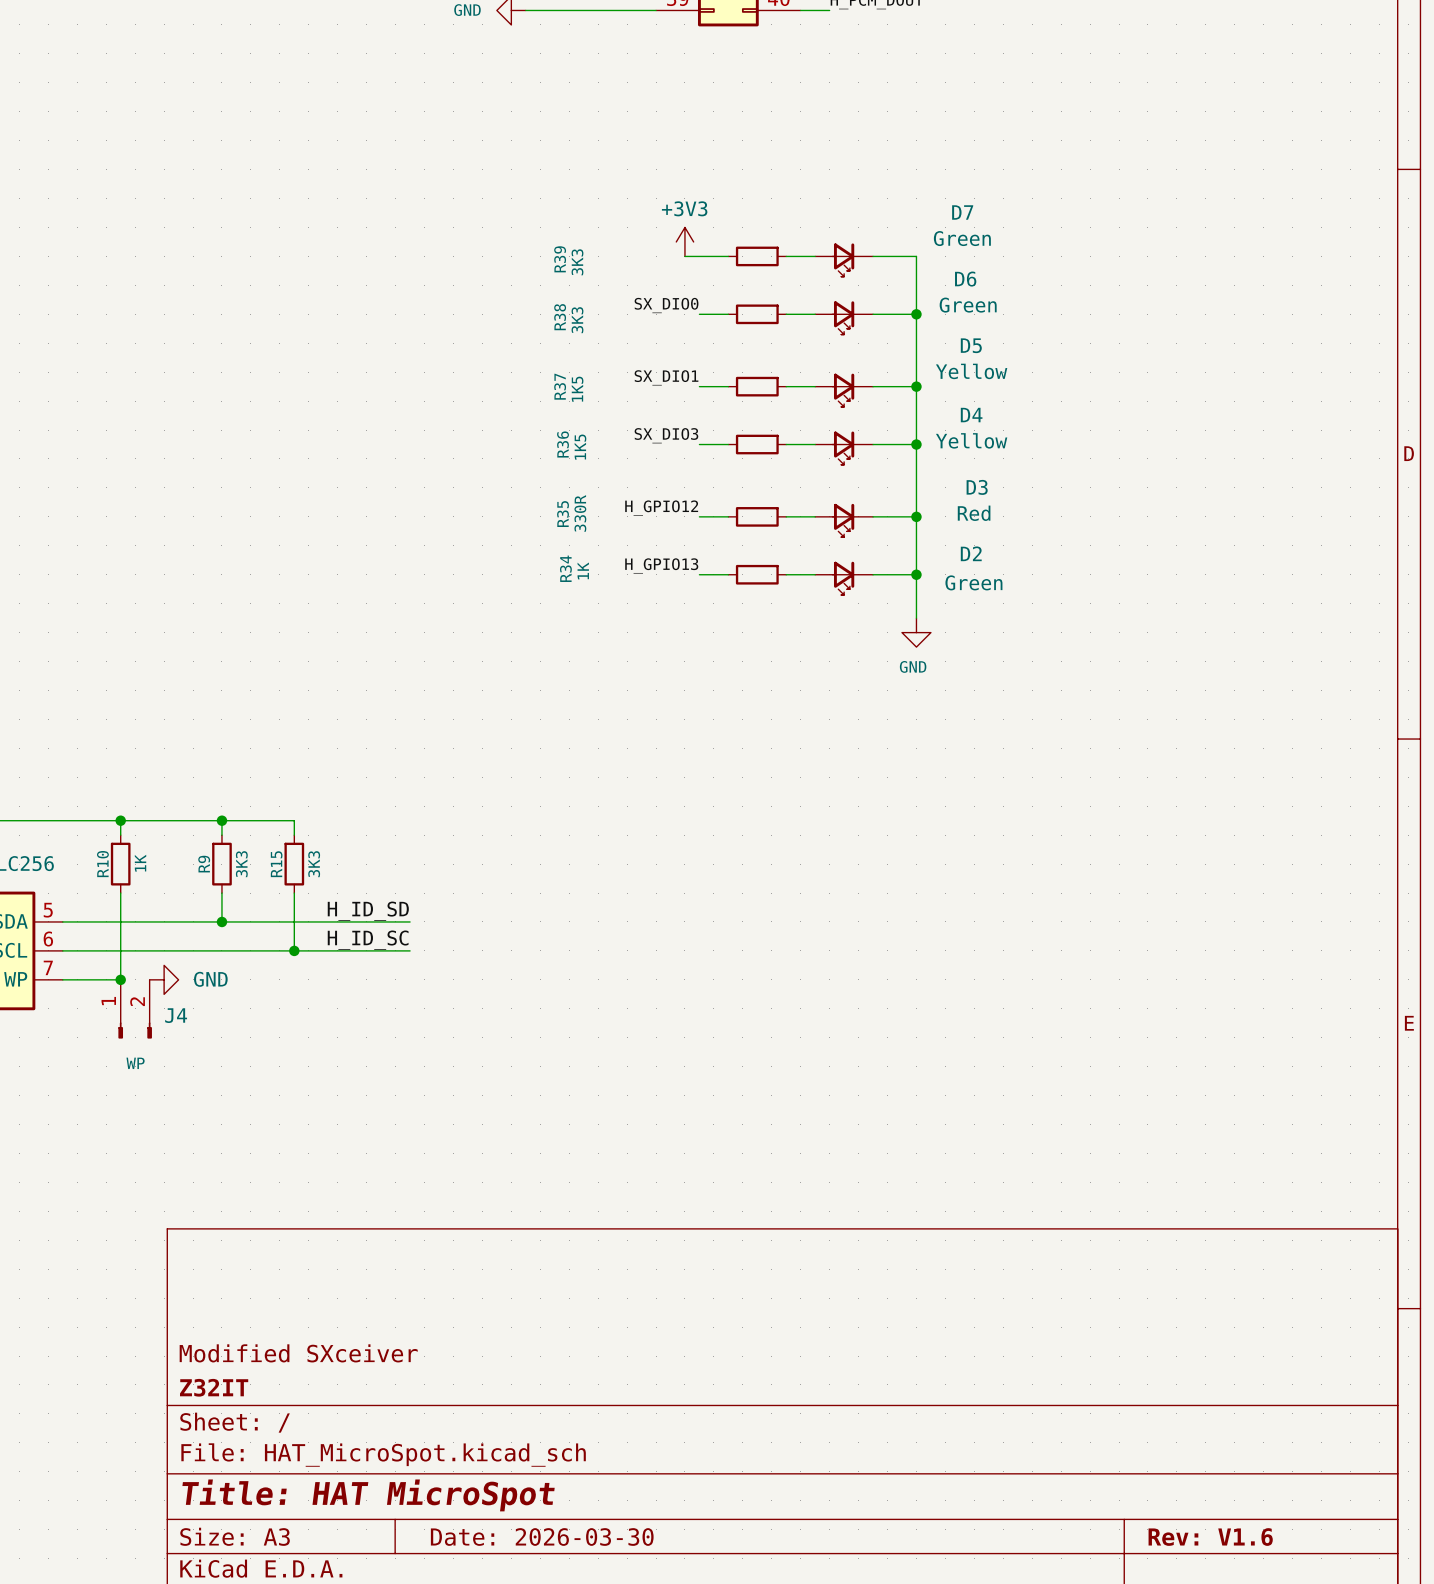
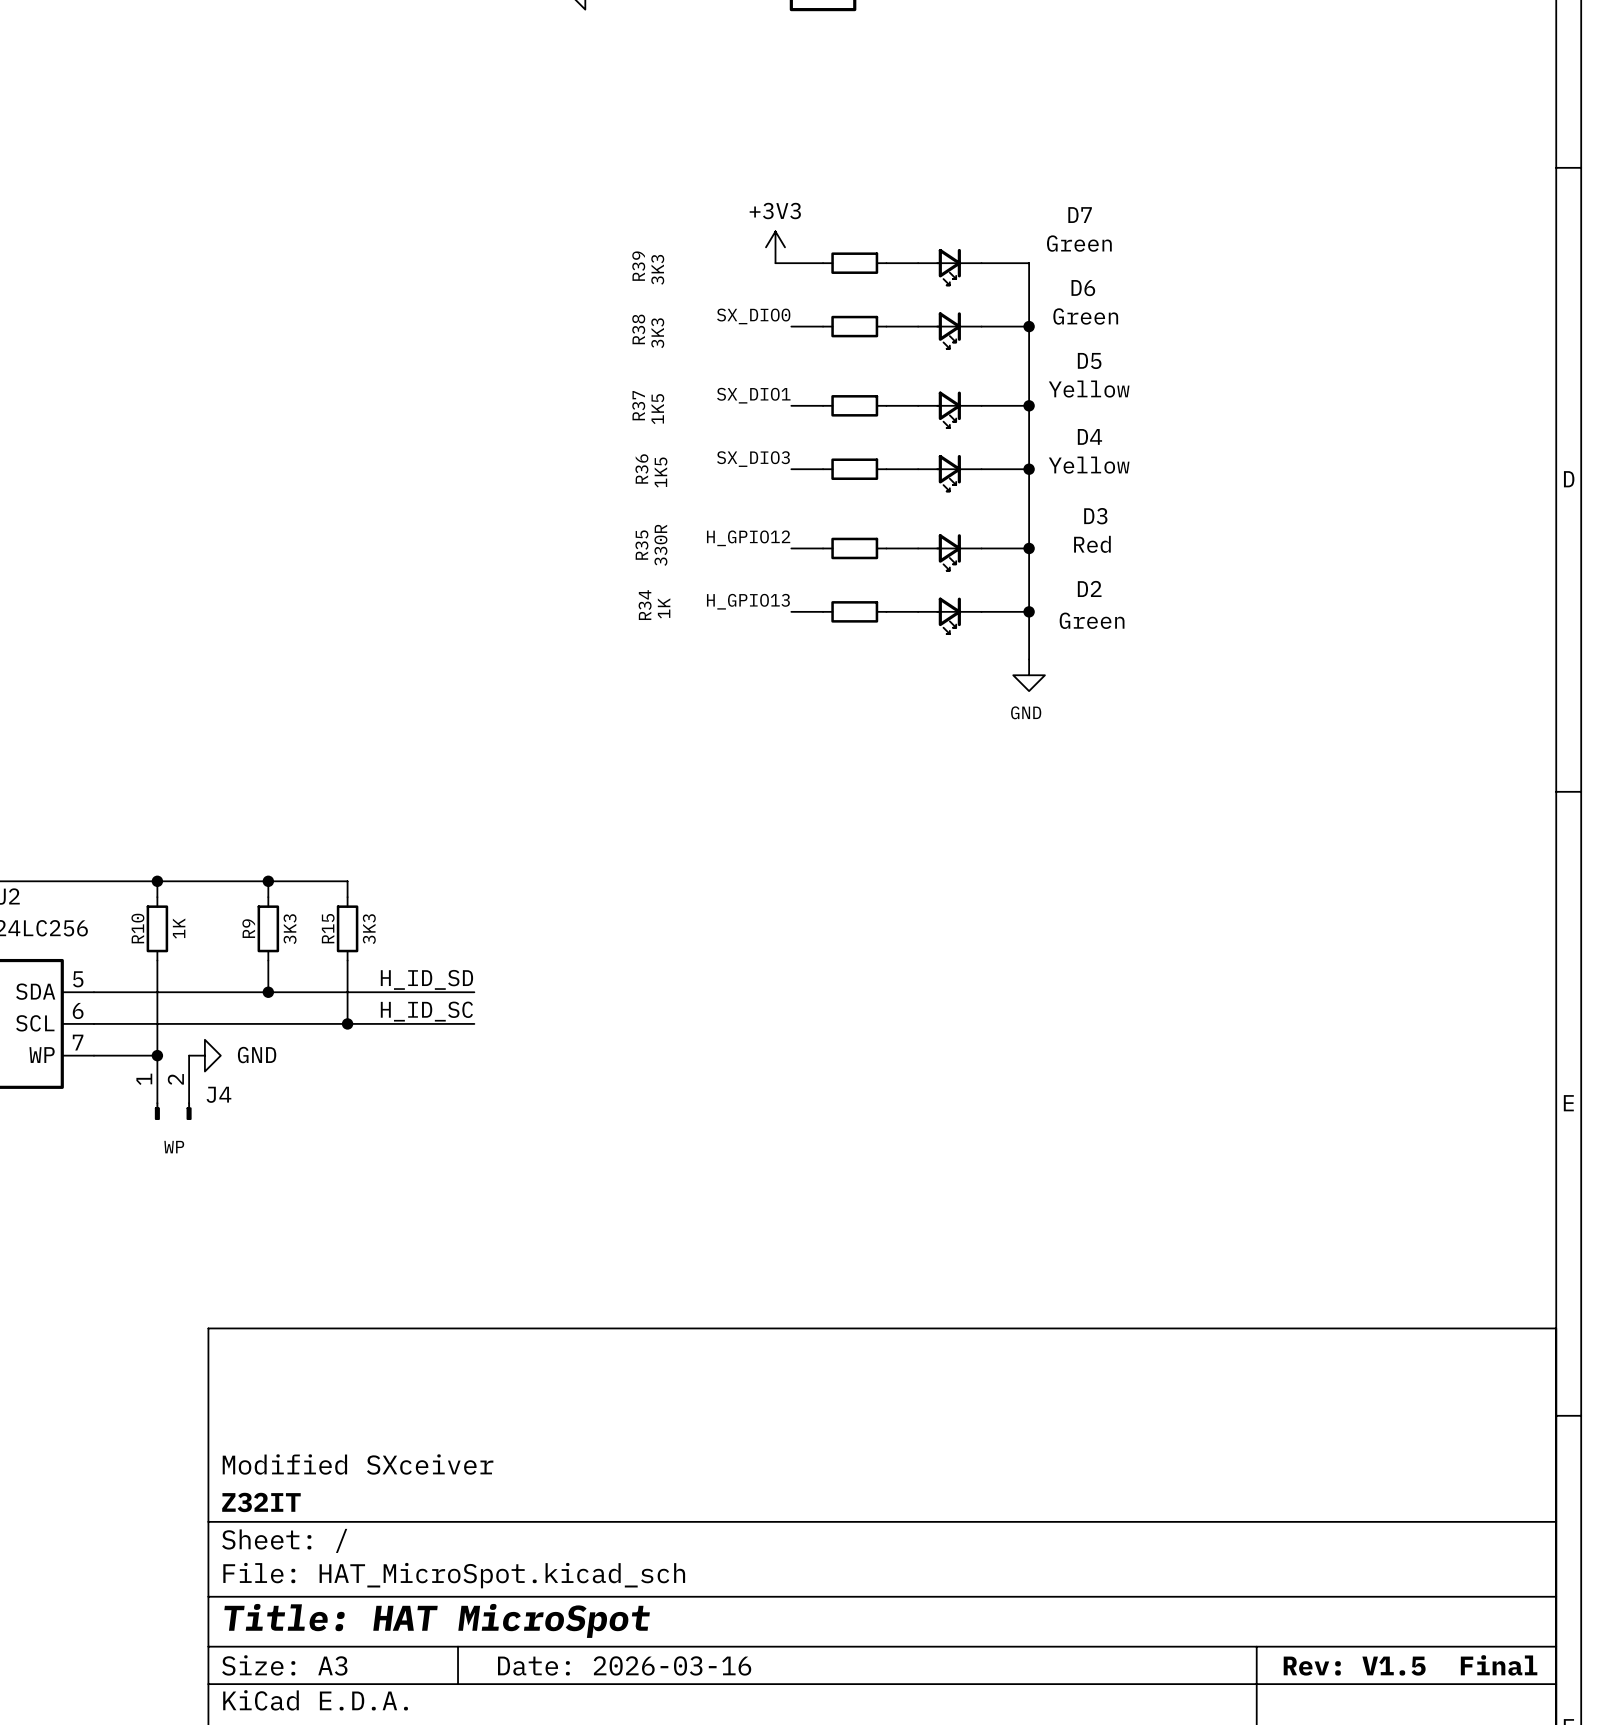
title block: Date: 2026-03-30 (542, 1537) -> Date: 2026-03-16 (624, 1665)
title block: Rev: V1.6 (1210, 1537) -> Rev: V1.5 Final (1410, 1665)

